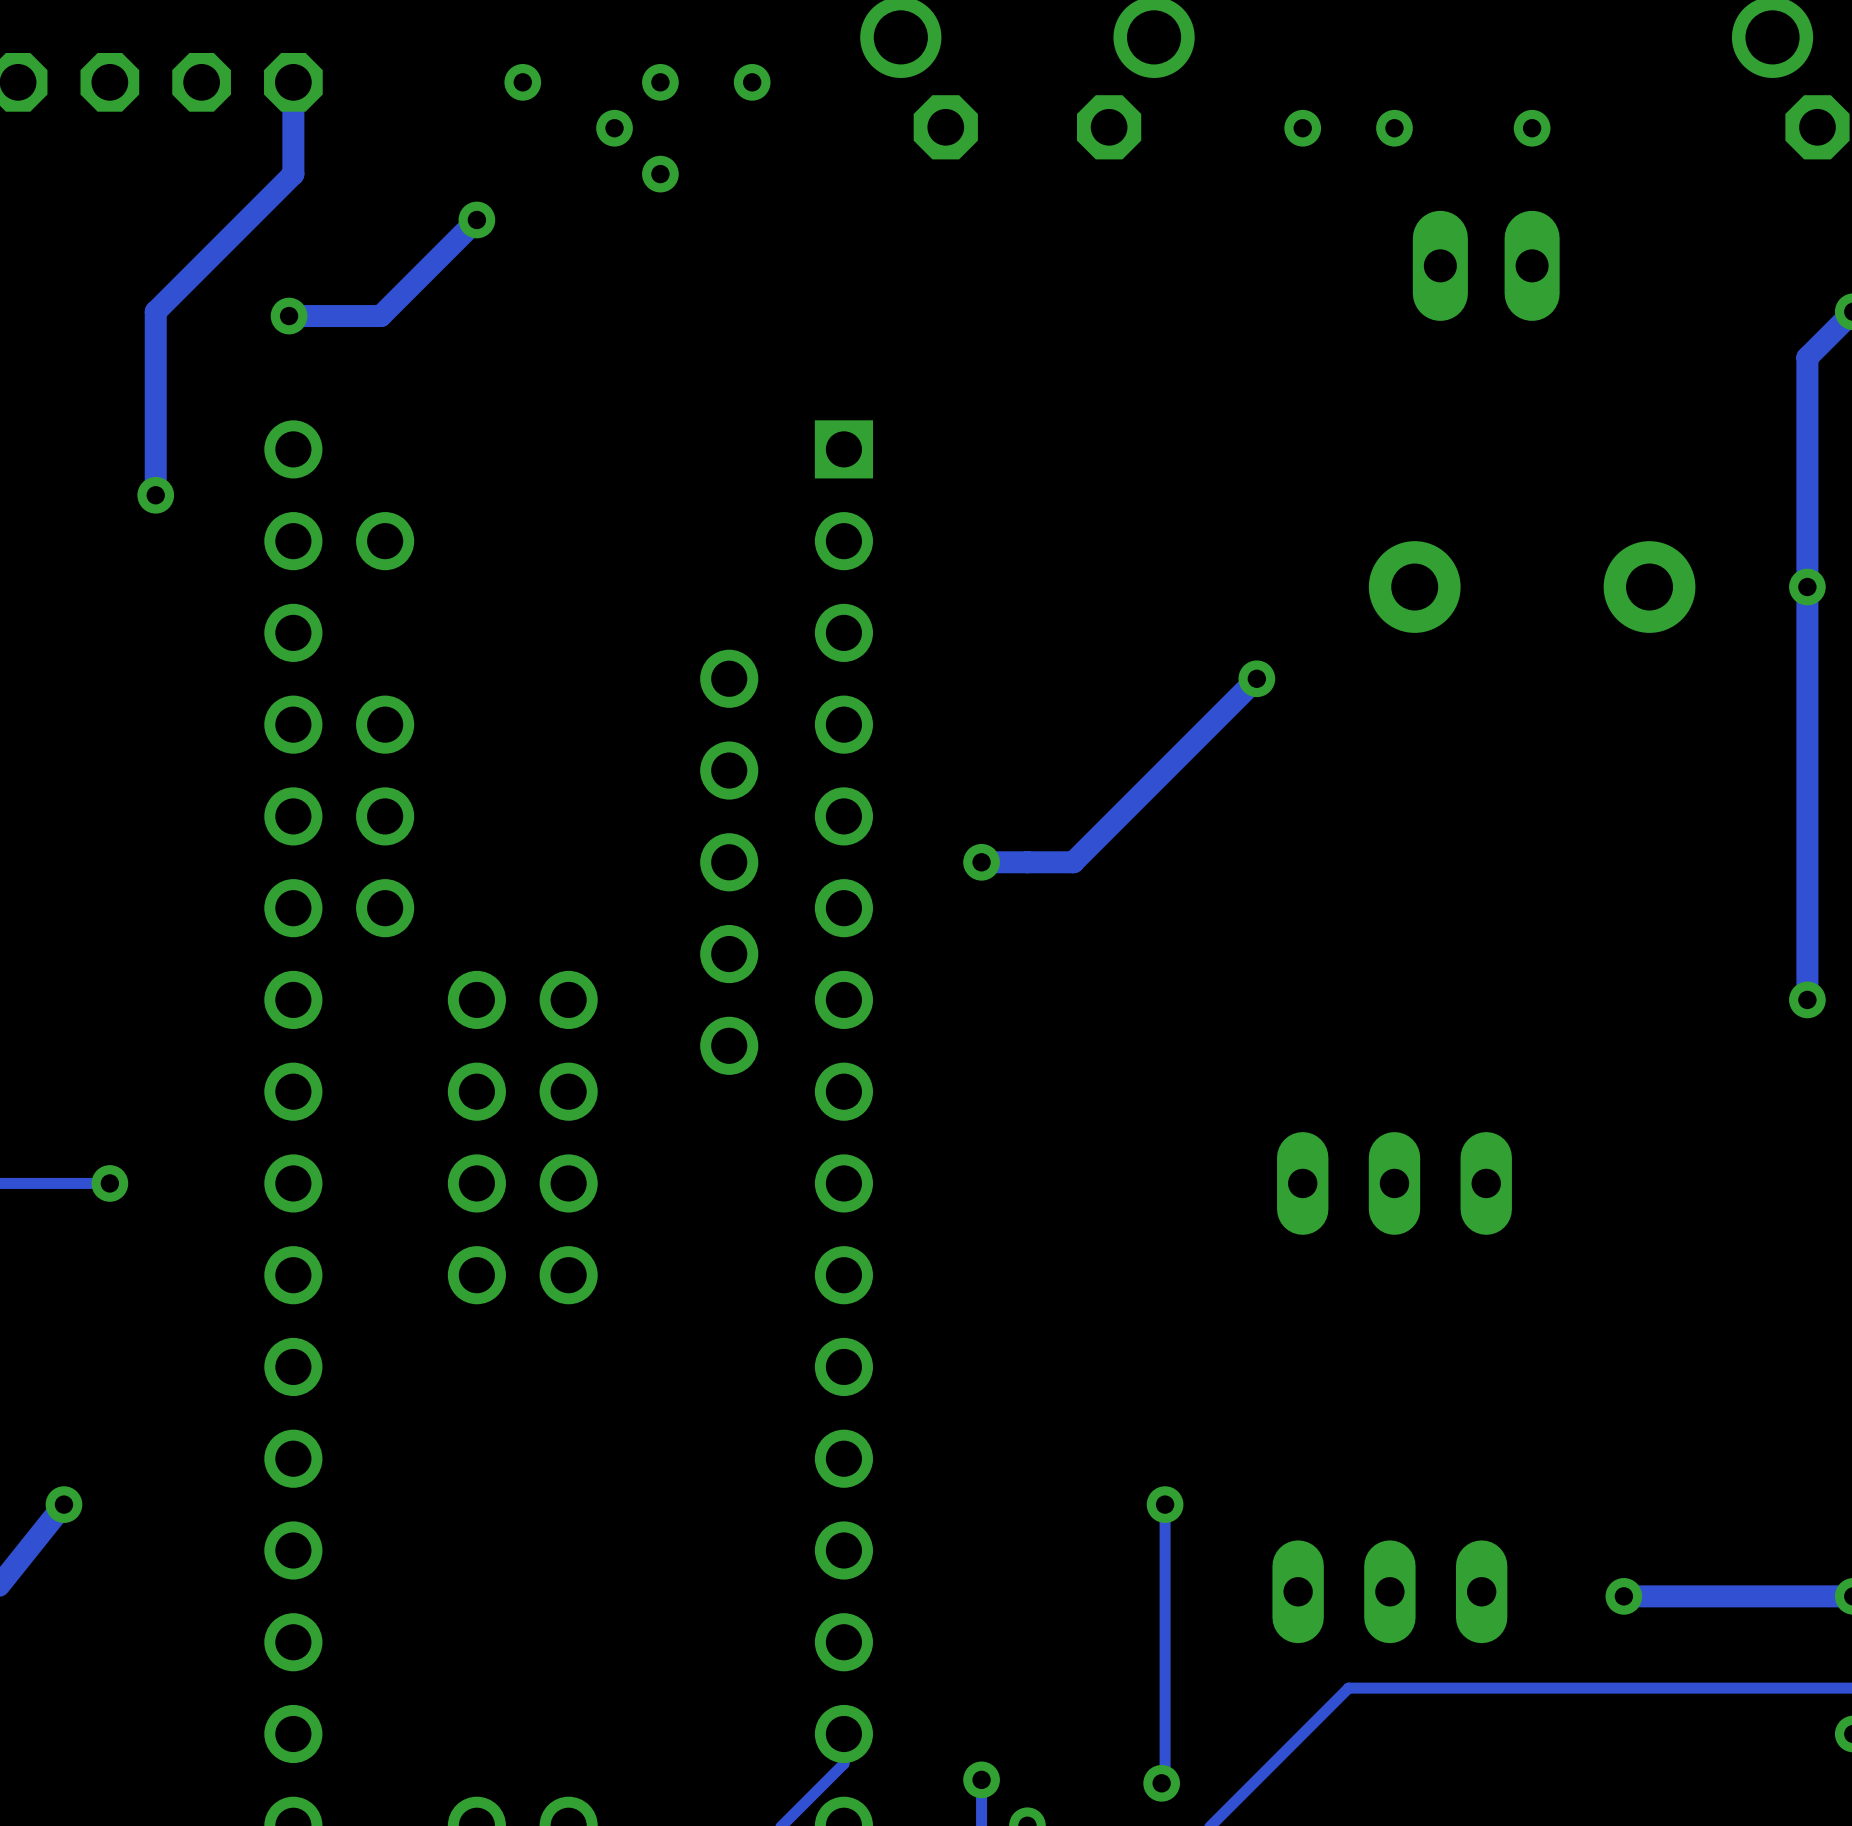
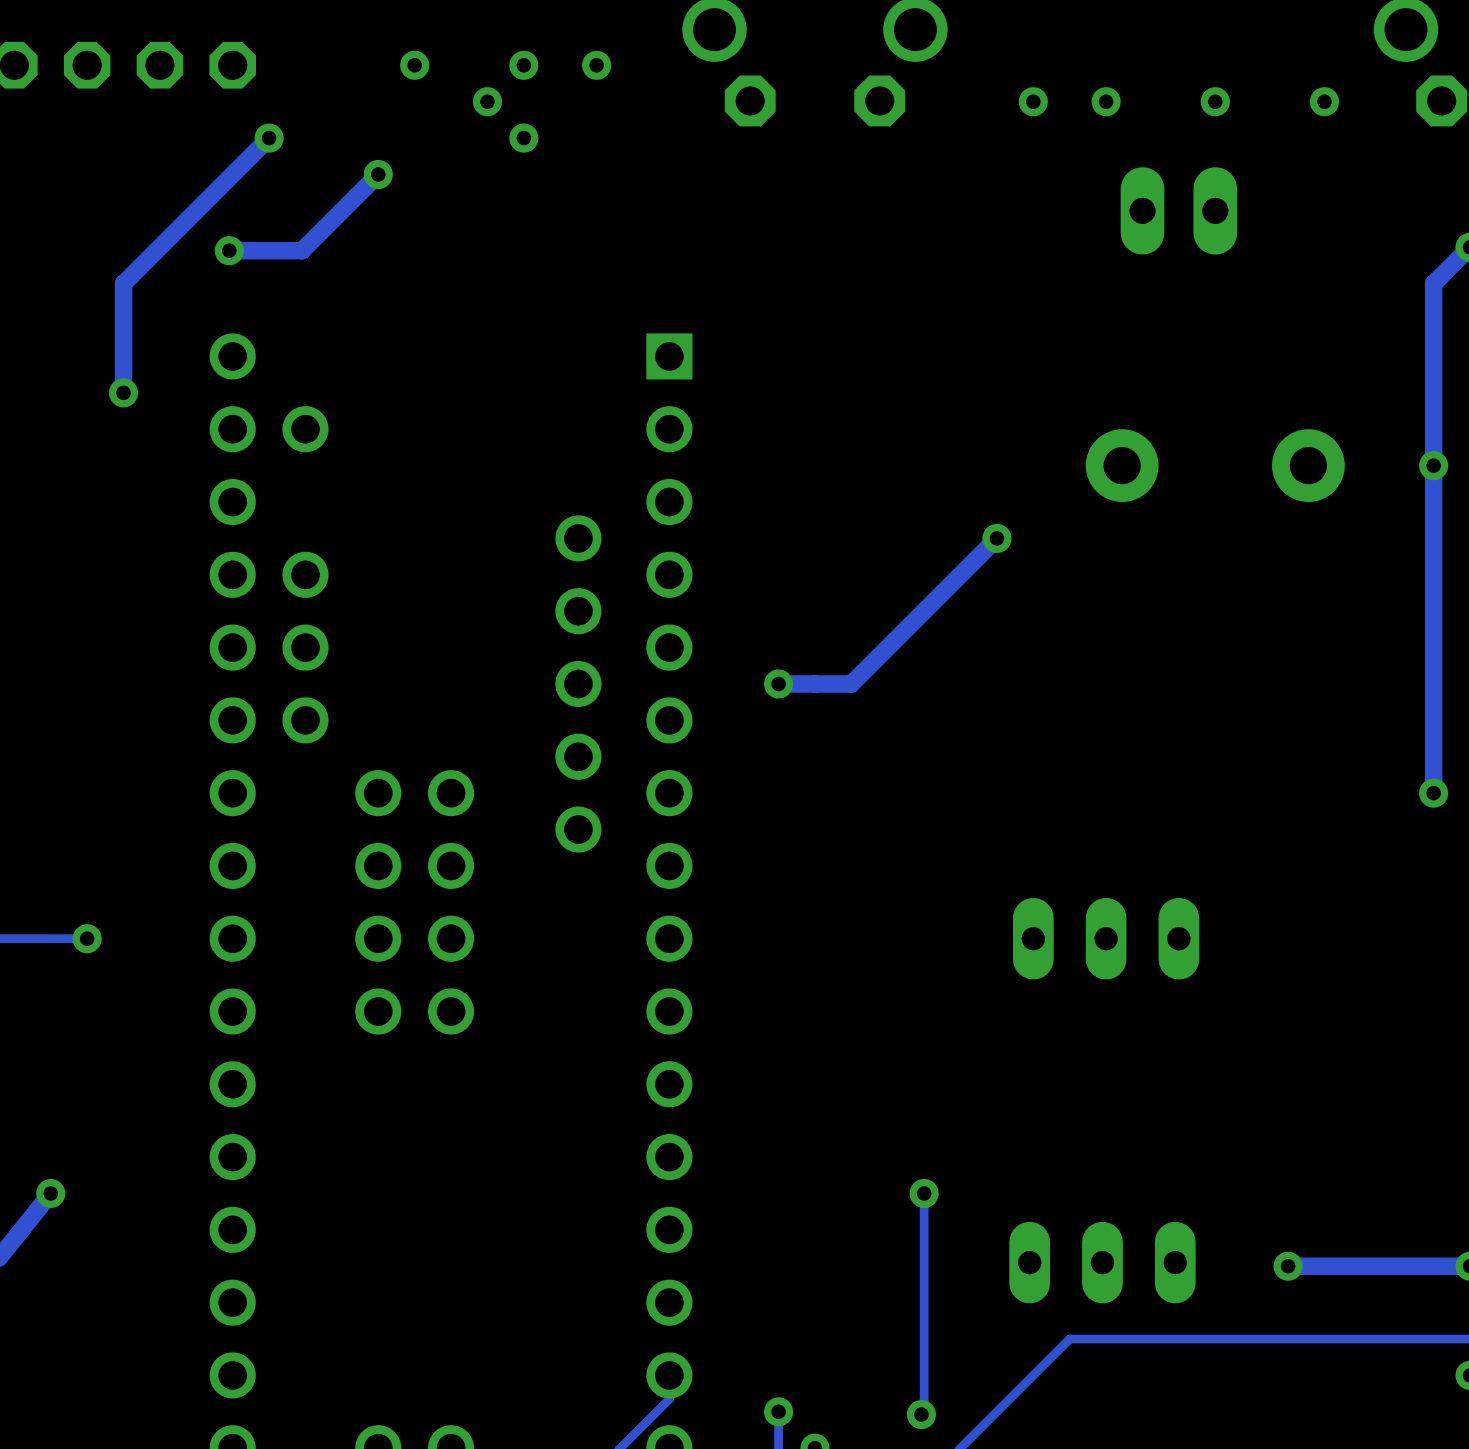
track: (293, 82) (293, 174) (155, 311) (155, 357) -> (269, 138) (123, 283)
via: none -> (1324, 101)
via: none -> (269, 138)

